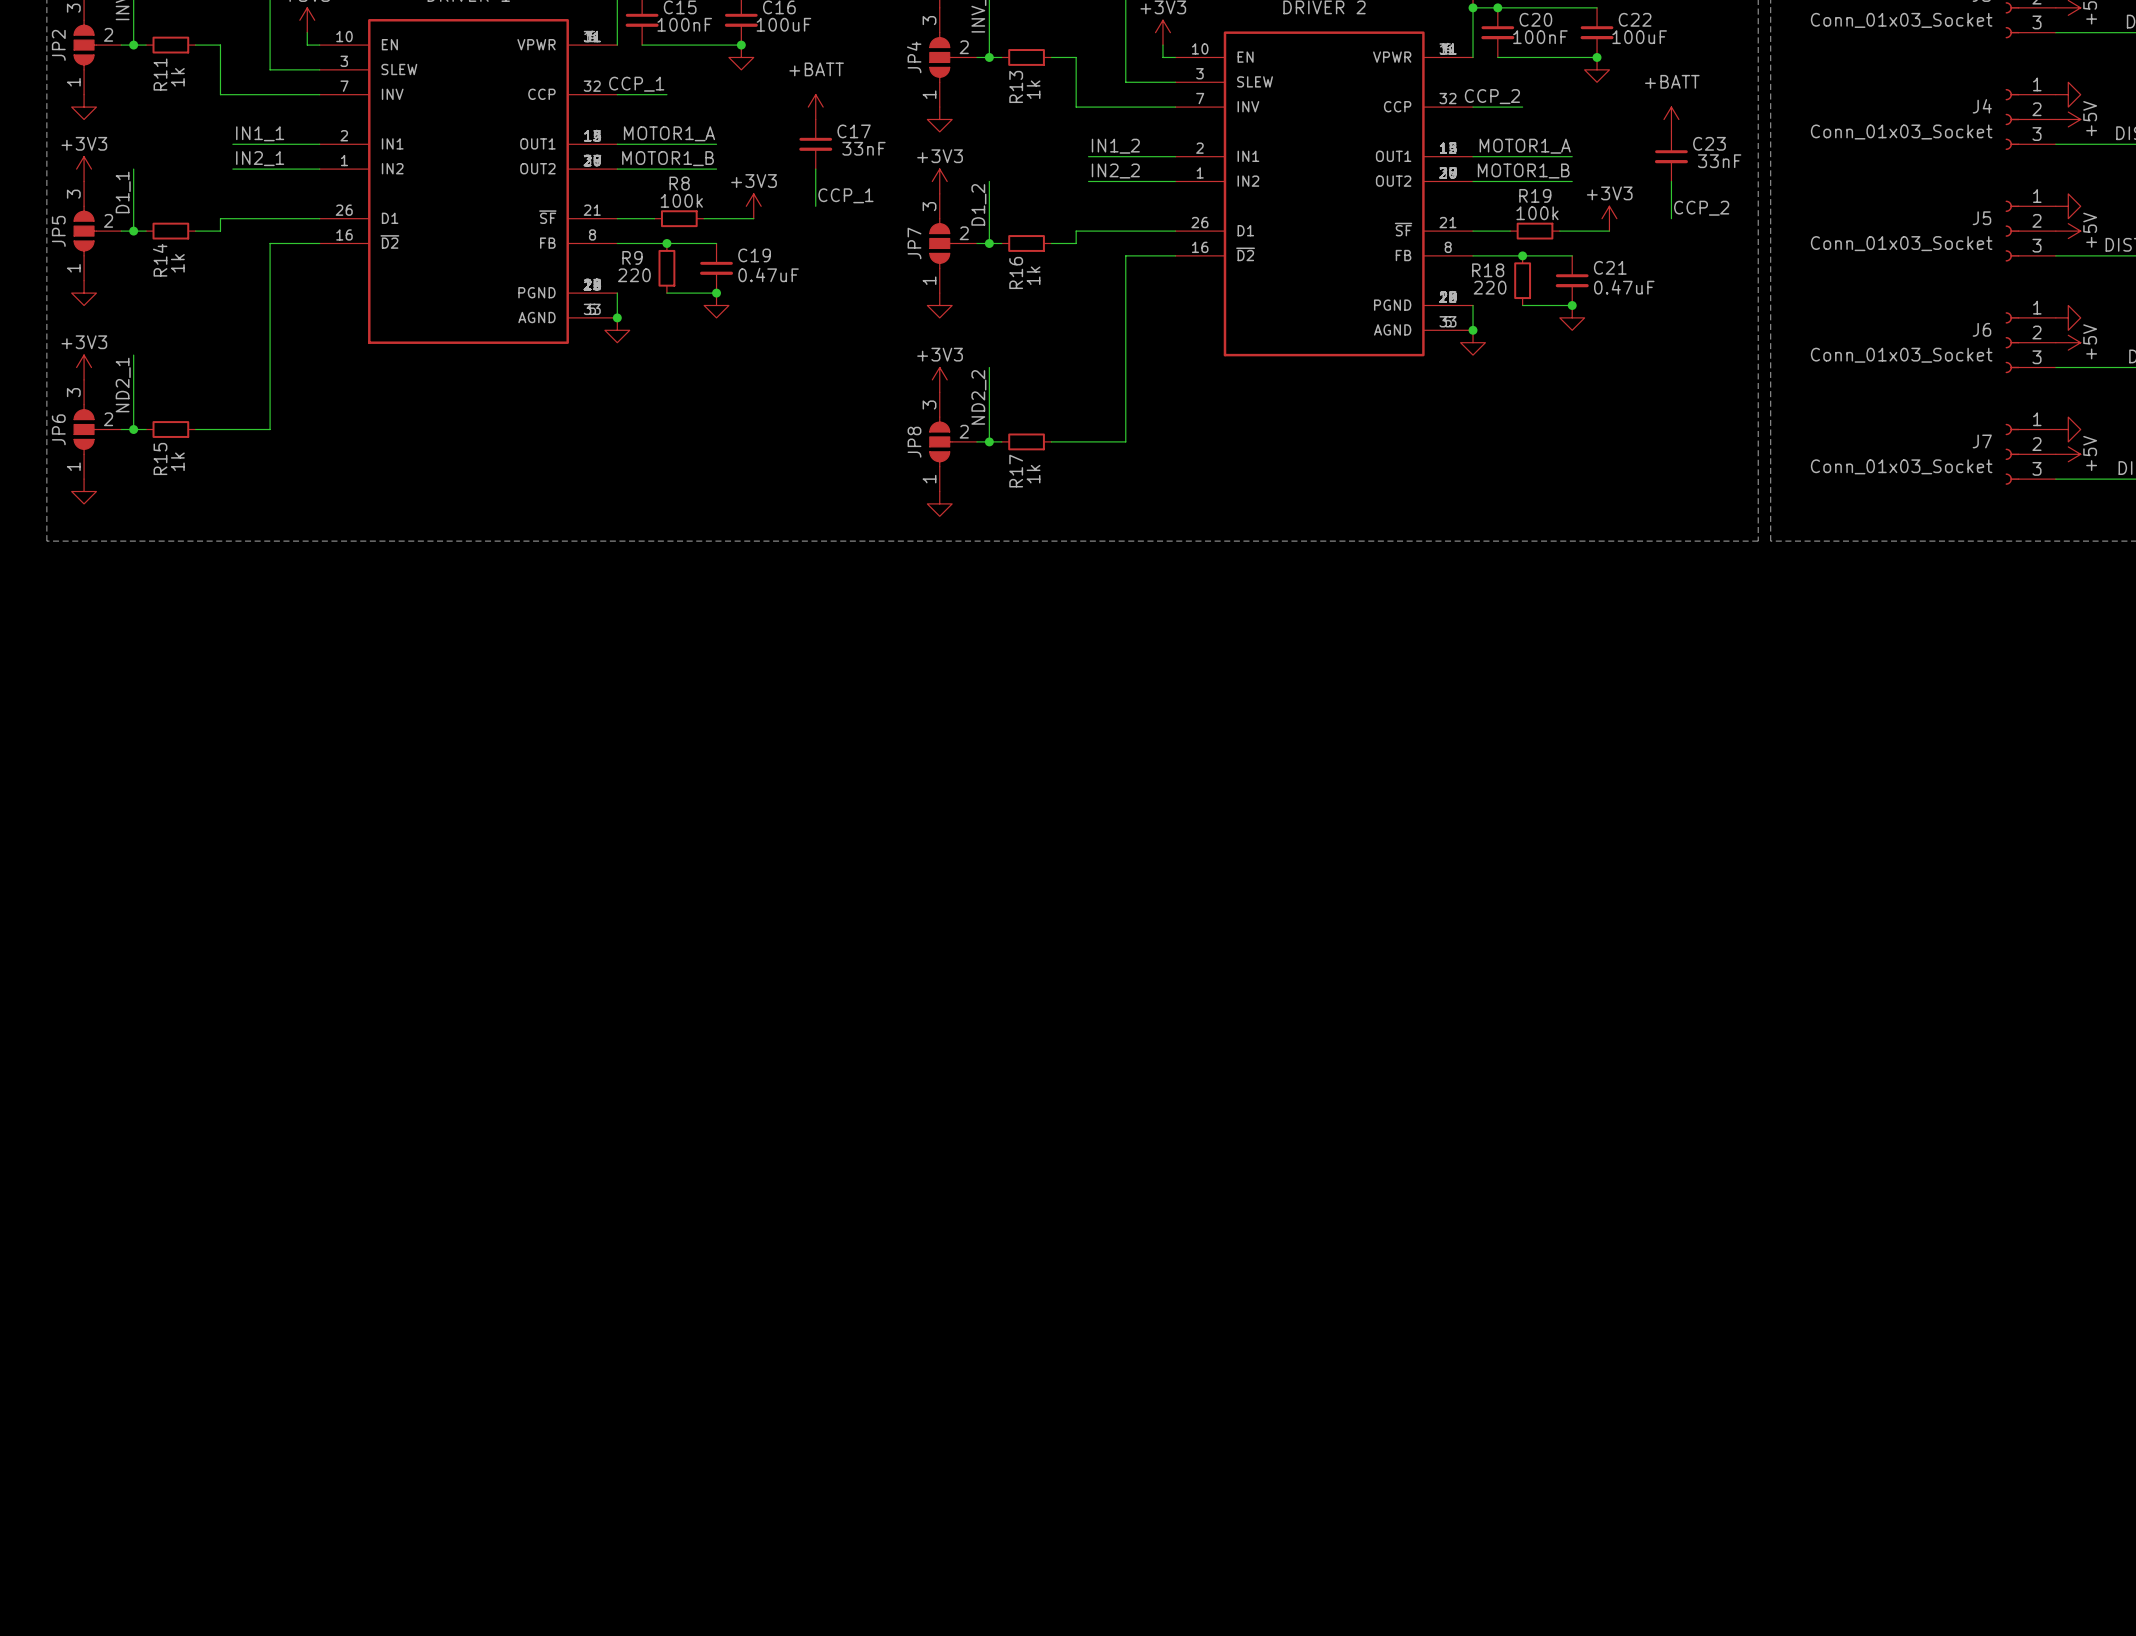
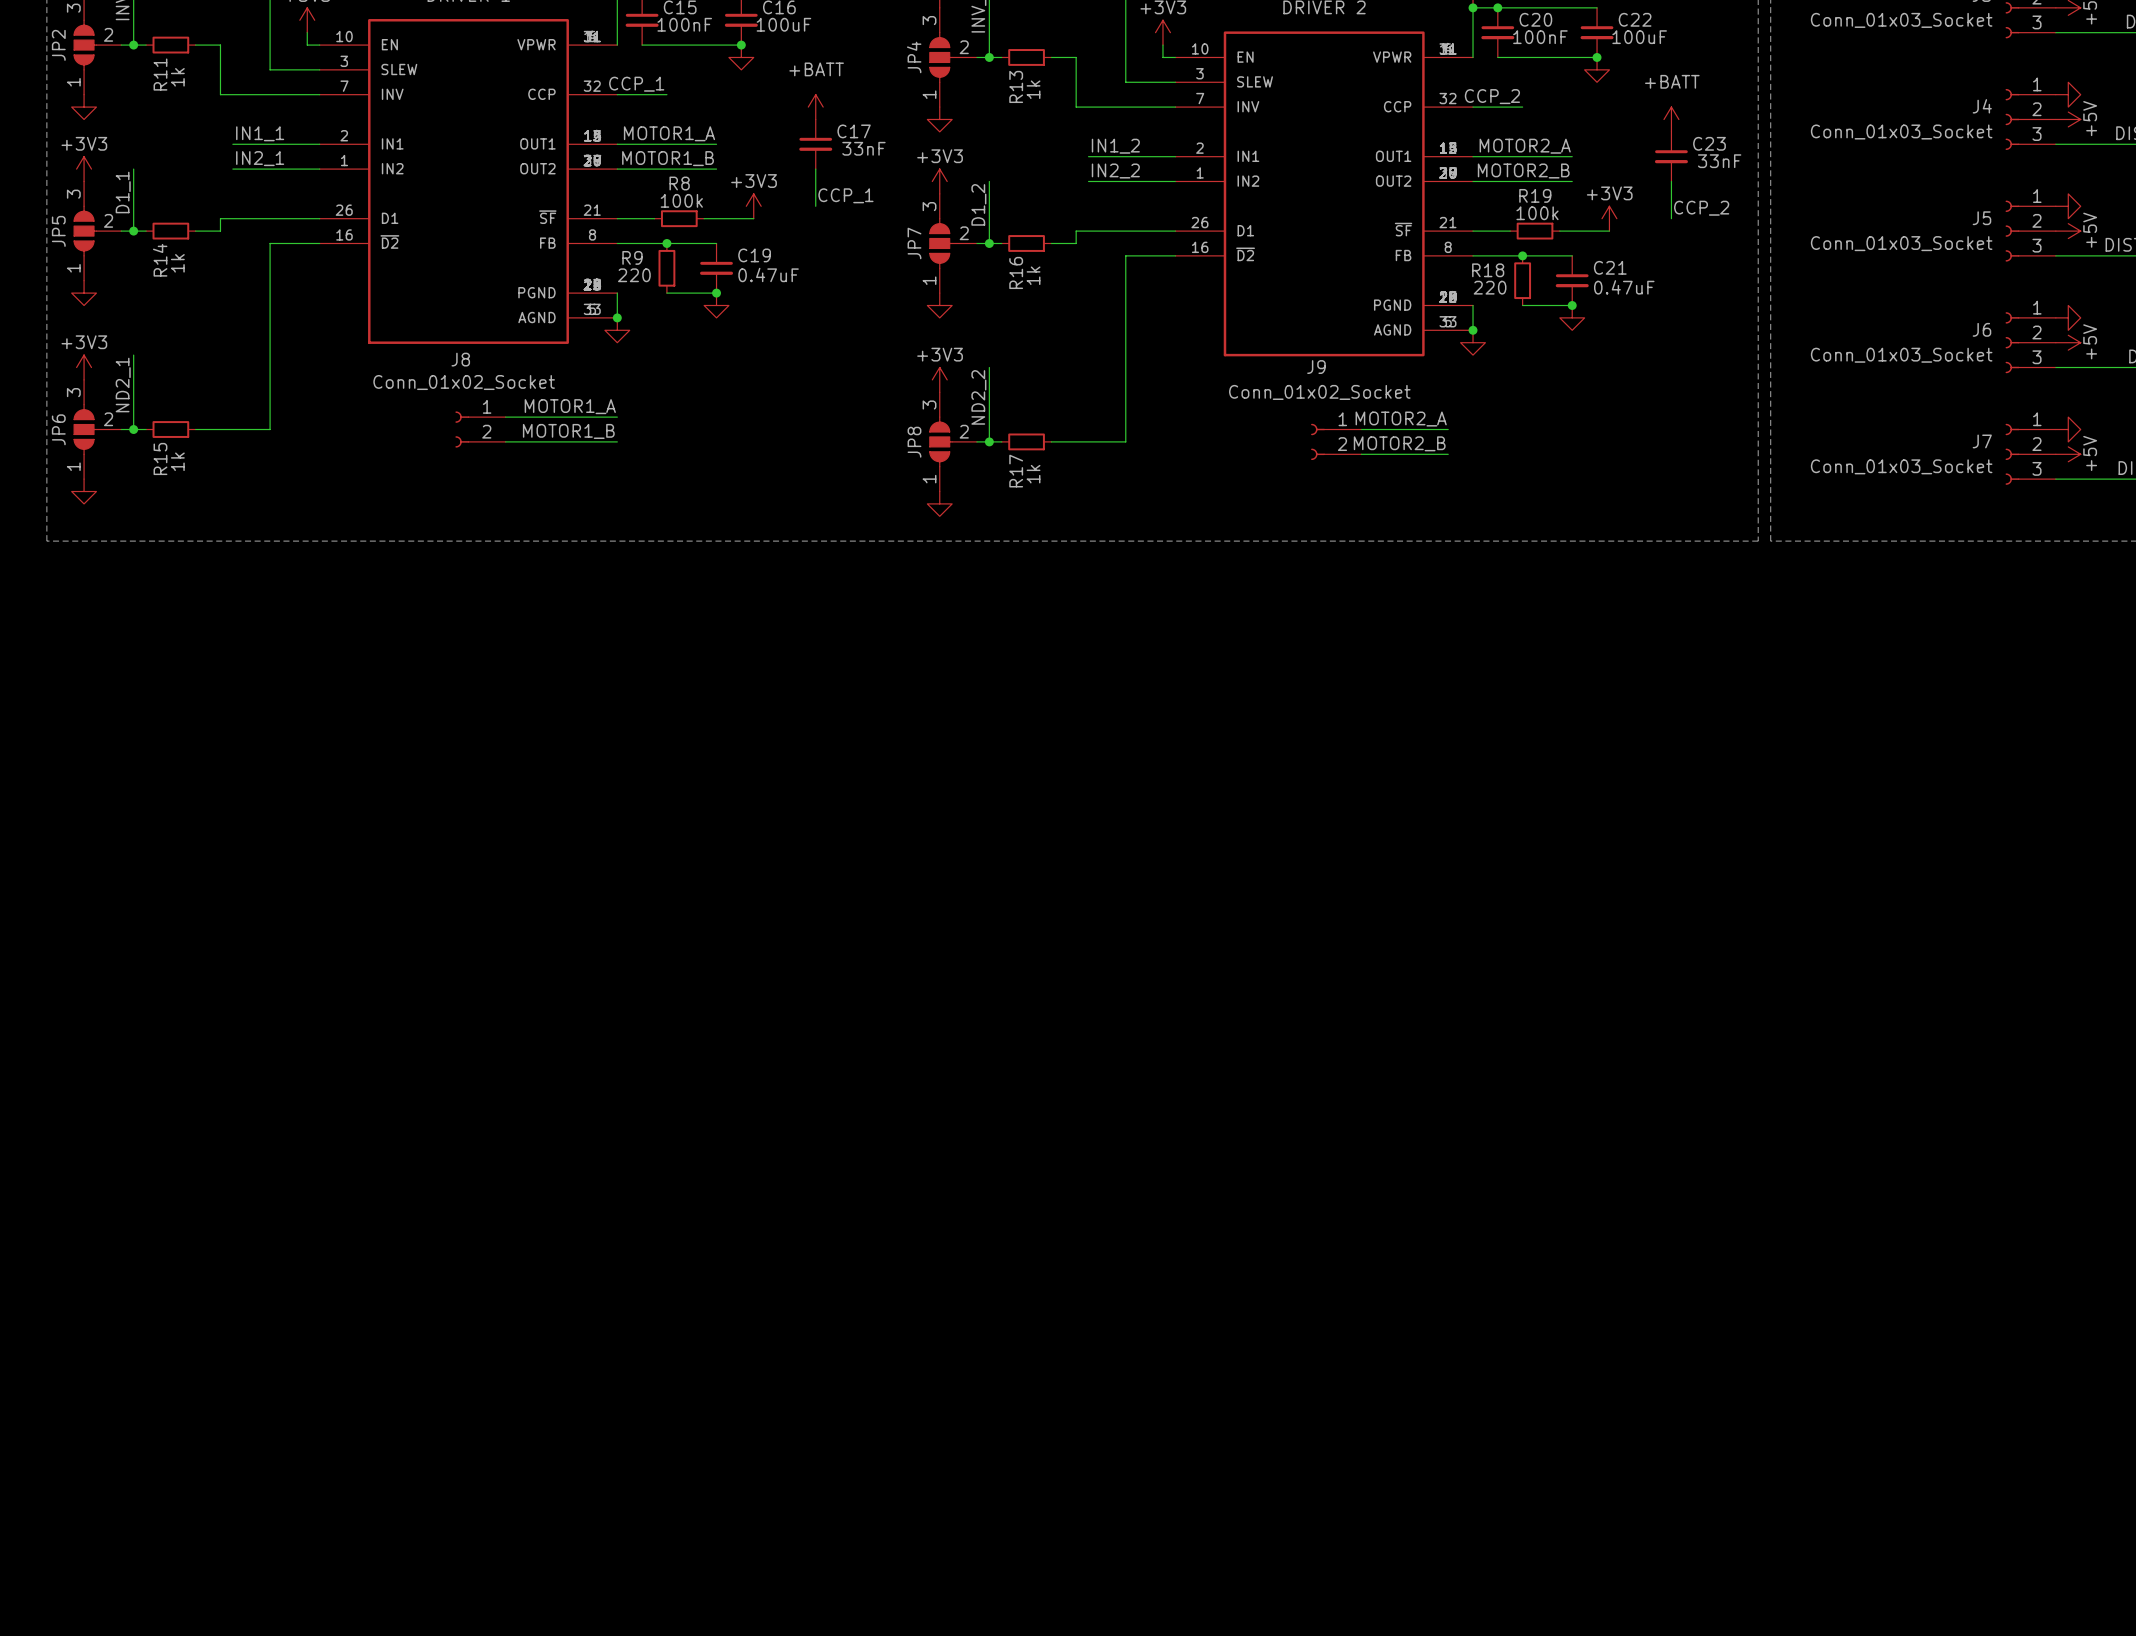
label: MOTOR1_A (1525, 146) -> MOTOR2_A (1525, 146)
label: MOTOR1_B (1523, 171) -> MOTOR2_B (1523, 171)
label: none -> MOTOR1_A (570, 406)
wire: none -> (505, 417) (617, 417)
label: none -> MOTOR2_A (1401, 419)
J8: none -> Conn_01x02_Socket (480, 429)
wire: none -> (1361, 429) (1448, 429)
label: none -> MOTOR1_B (568, 431)
wire: none -> (505, 441) (617, 441)
J9: none -> Conn_01x02_Socket (1336, 441)
label: none -> MOTOR2_B (1399, 443)
wire: none -> (1361, 454) (1448, 454)

